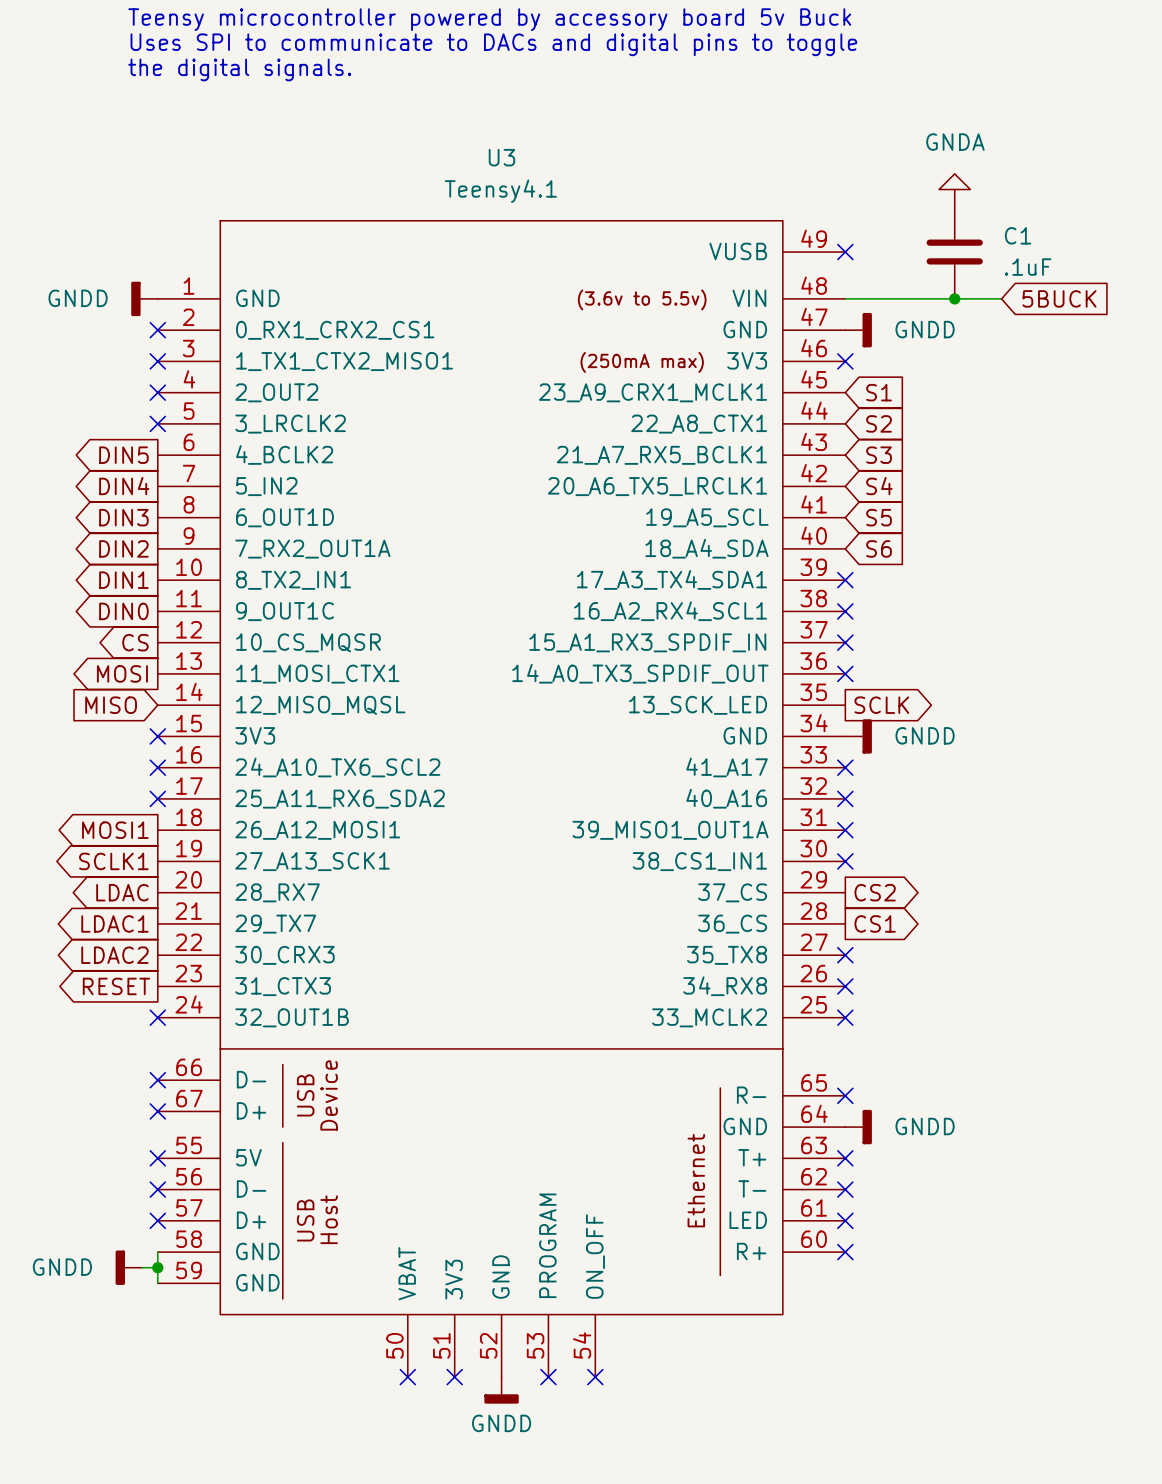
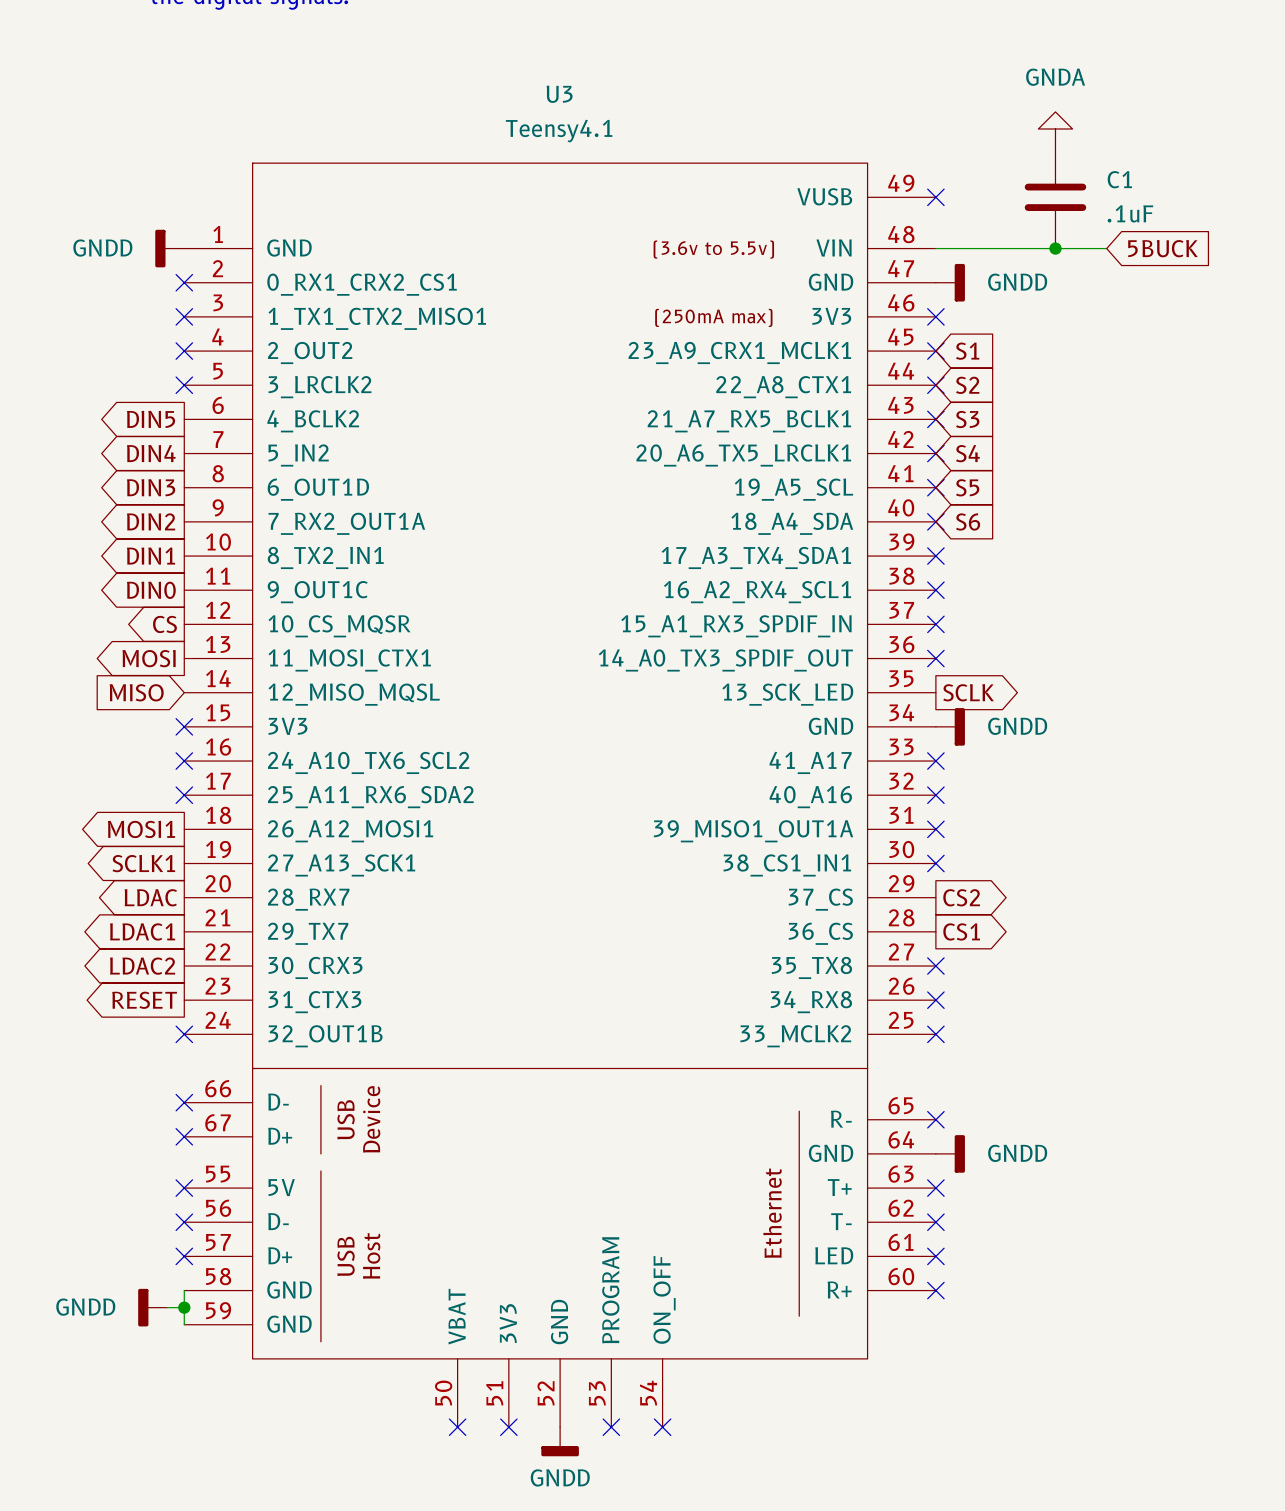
no-connect mark: none -> (935, 351)
no-connect mark: none -> (935, 385)
no-connect mark: none -> (935, 419)
no-connect mark: none -> (935, 453)
no-connect mark: none -> (935, 487)
no-connect mark: none -> (935, 521)

